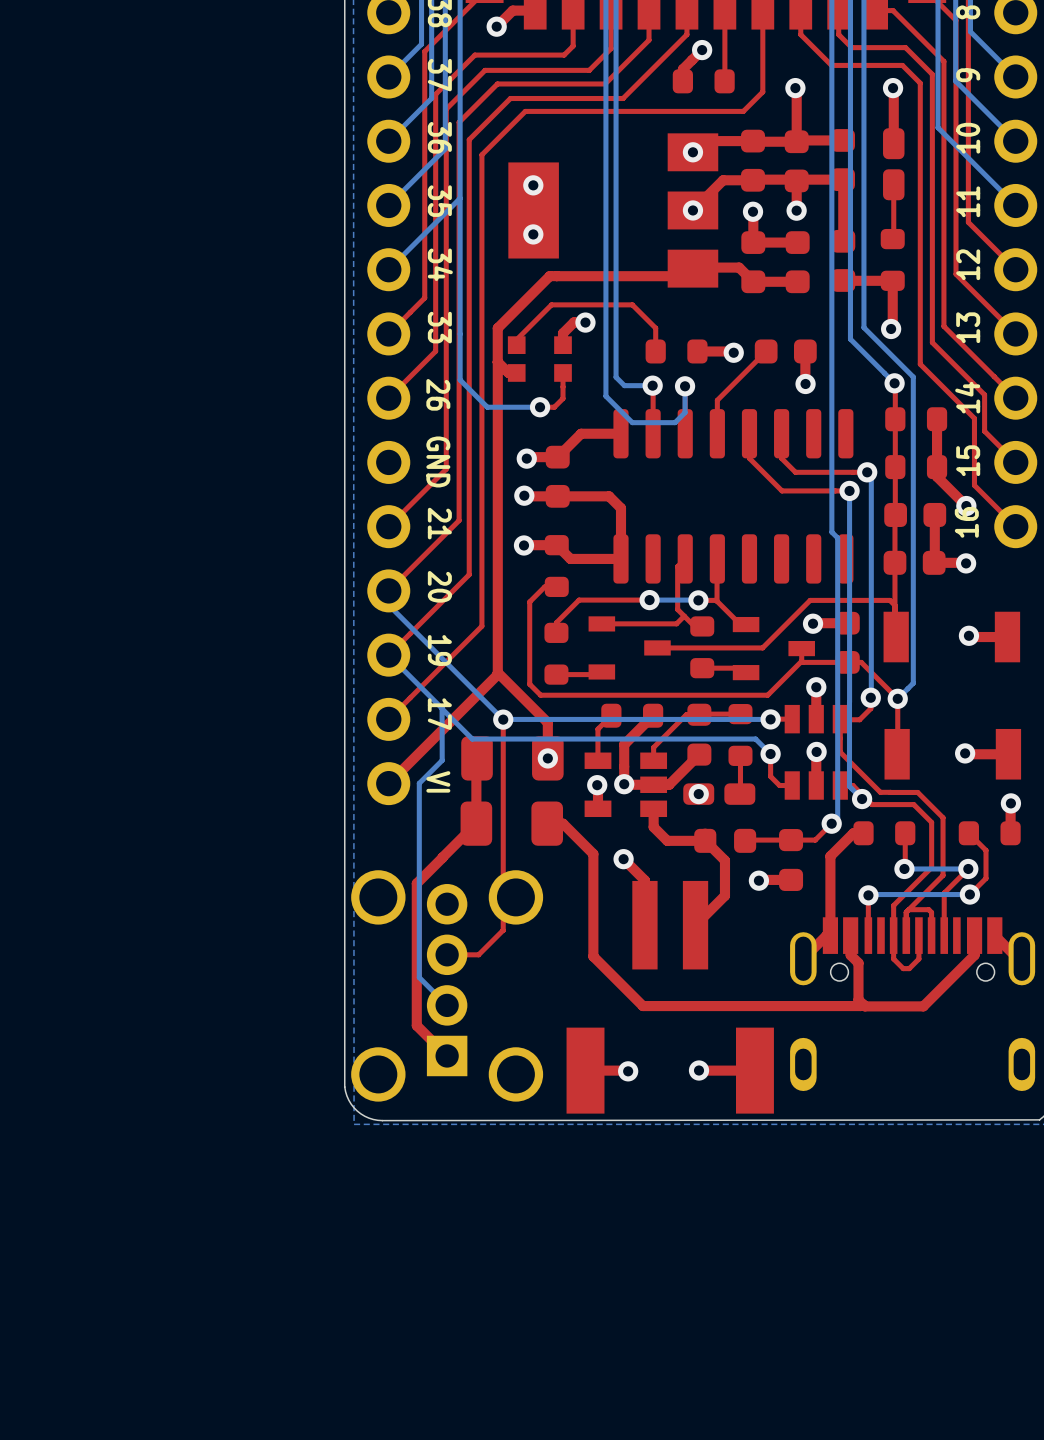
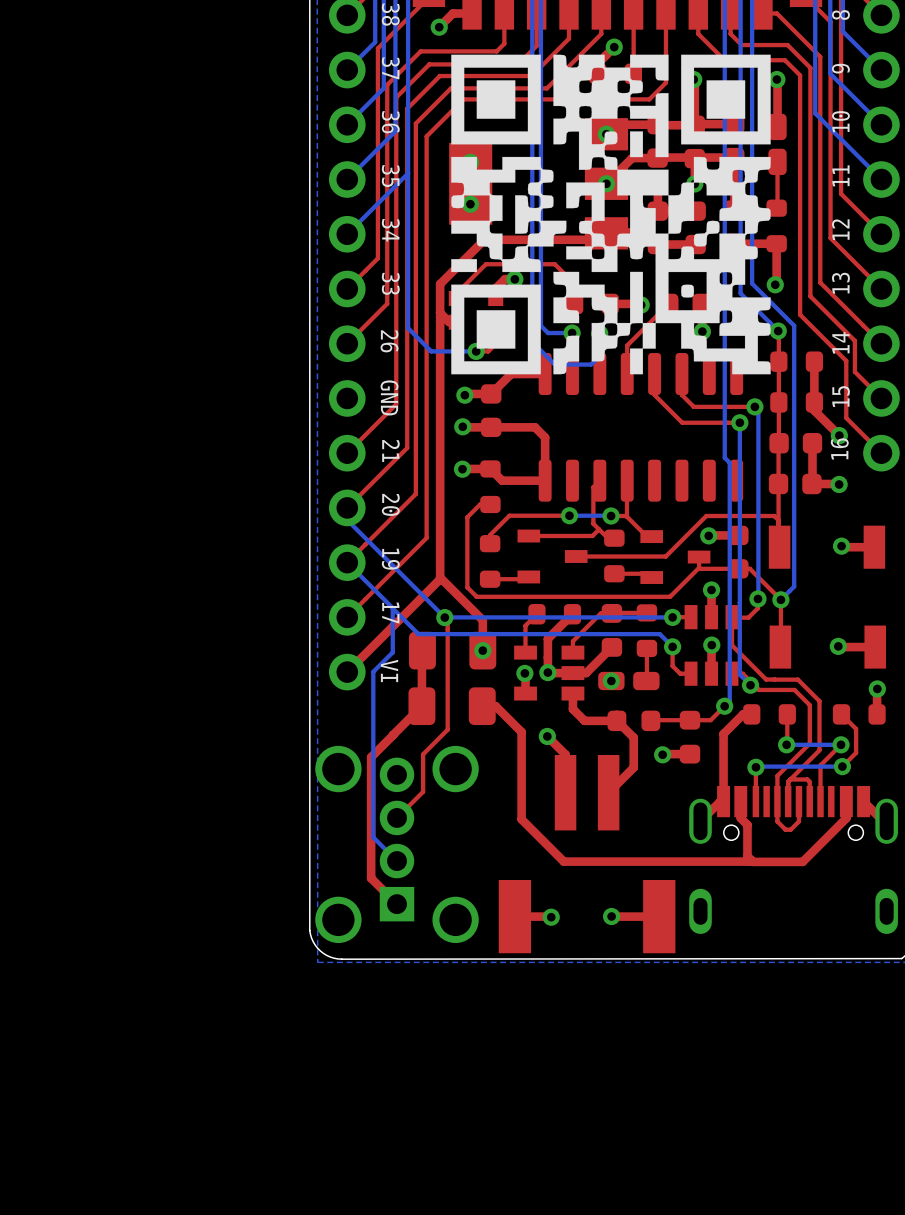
drawing: none -> [451, 54, 771, 375]
top track: (503, 719) (503, 930) -> none
top track: (503, 930) (478, 954) (447, 954) -> (447, 617) (447, 729) (423, 754) (423, 791) (397, 817)

